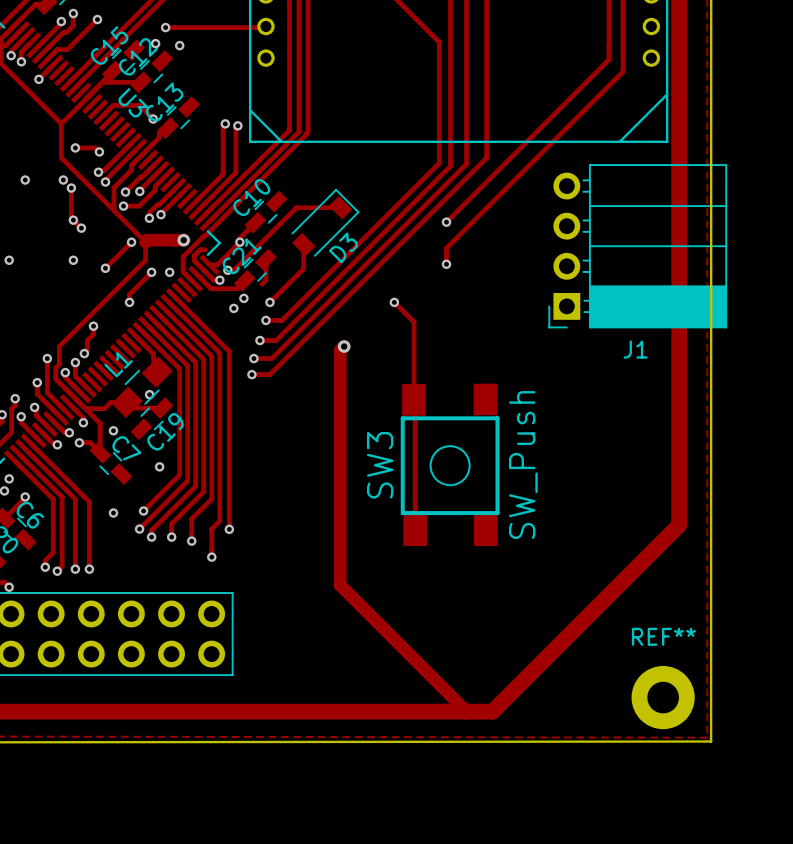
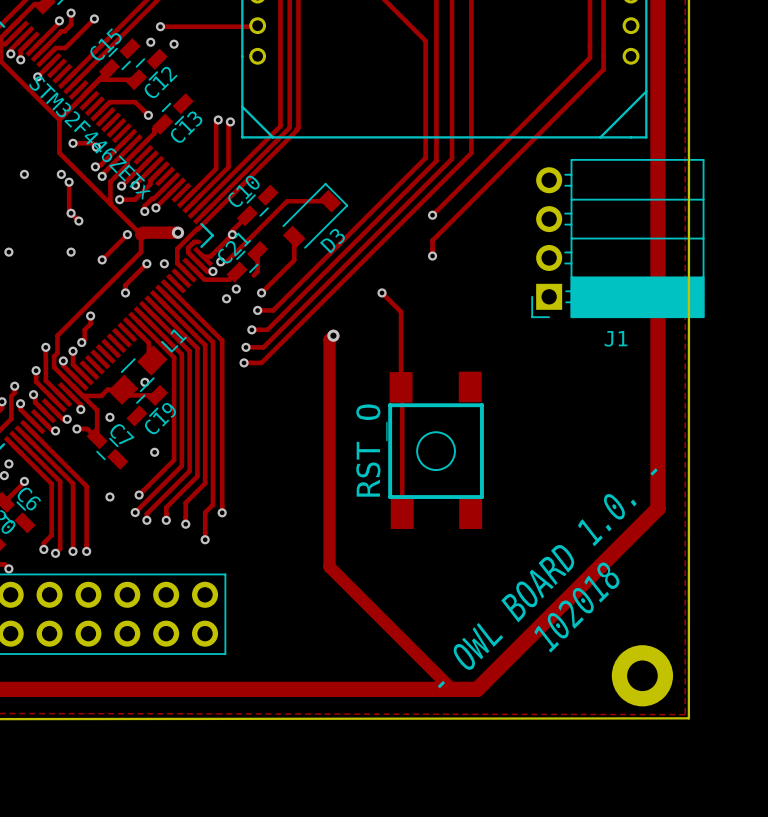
C12 name position: C12 (138, 56) -> C12 (161, 82)
C13 name position: C13 (164, 101) -> C13 (186, 127)
U3 name: U3 (133, 102) -> STM32F446ZETx (89, 138)
L1 name position: L1 (118, 364) -> L1 (173, 341)
SW3 name: SW3 (380, 465) -> RST_O (371, 450)
SW3 value: SW_Push (523, 465) -> none
text: none -> - OWL BOARD 1.0. - (547, 578)
text: none -> 102018 (576, 607)
REF** name: REF** (663, 636) -> none

